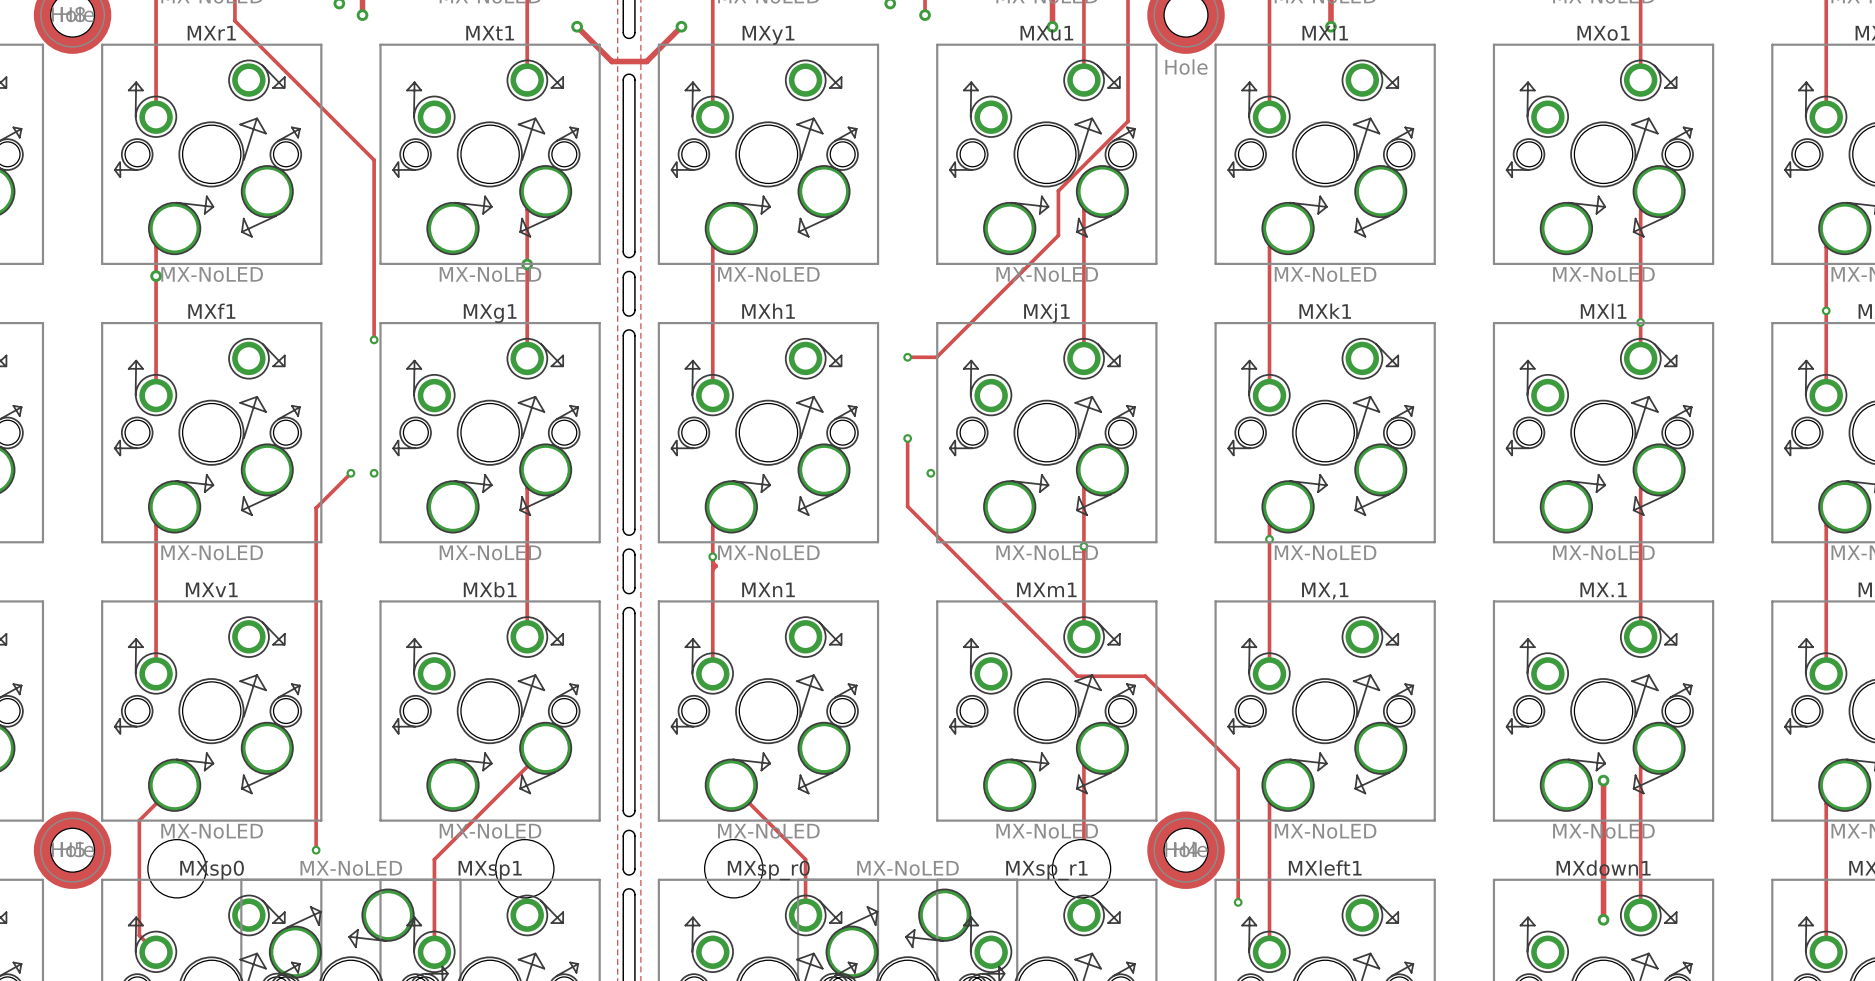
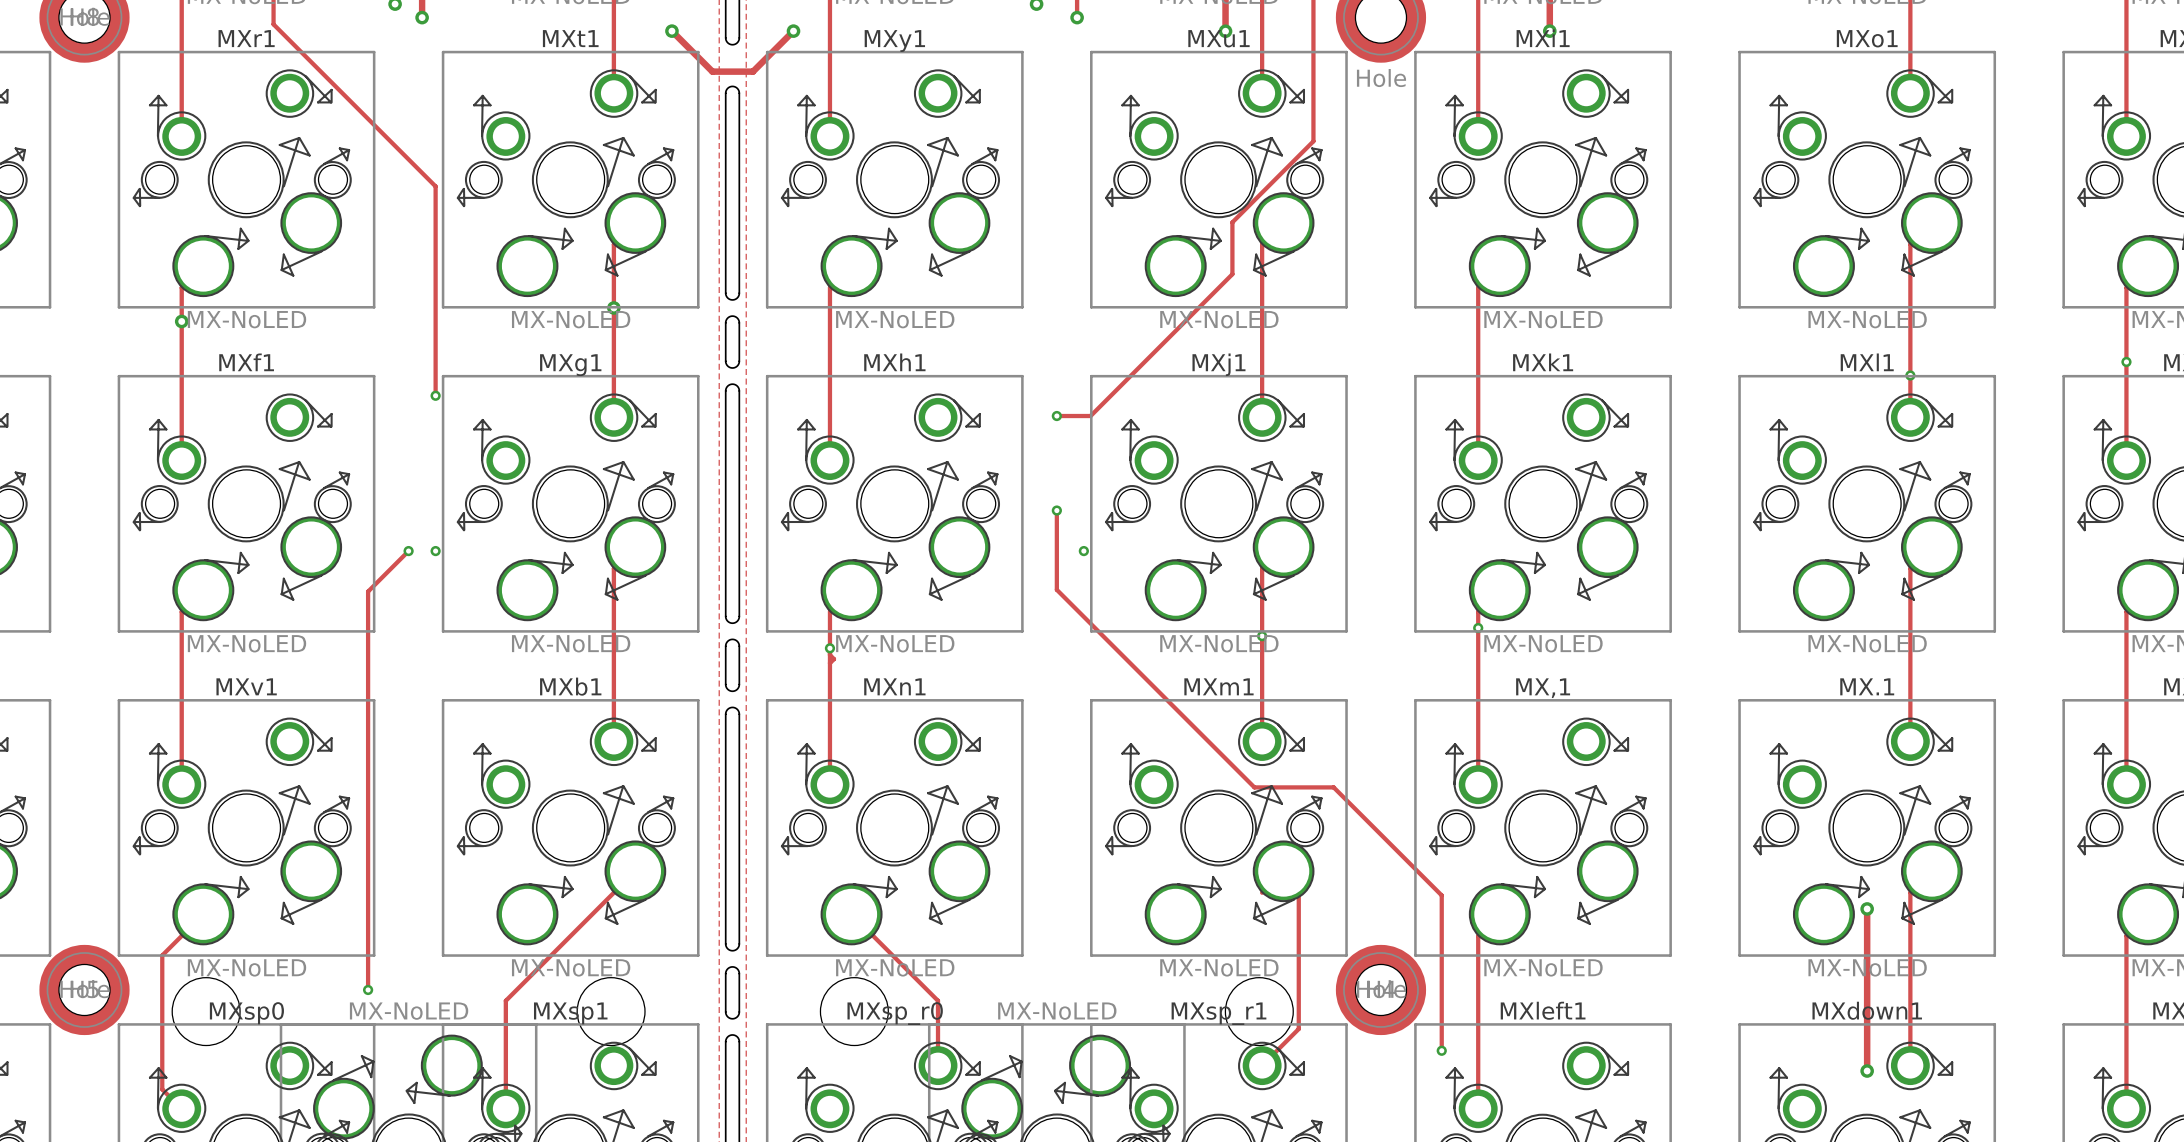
track: (1083, 766) (1083, 915) -> (1283, 871) (1298, 886) (1298, 1028) (1262, 1065)

